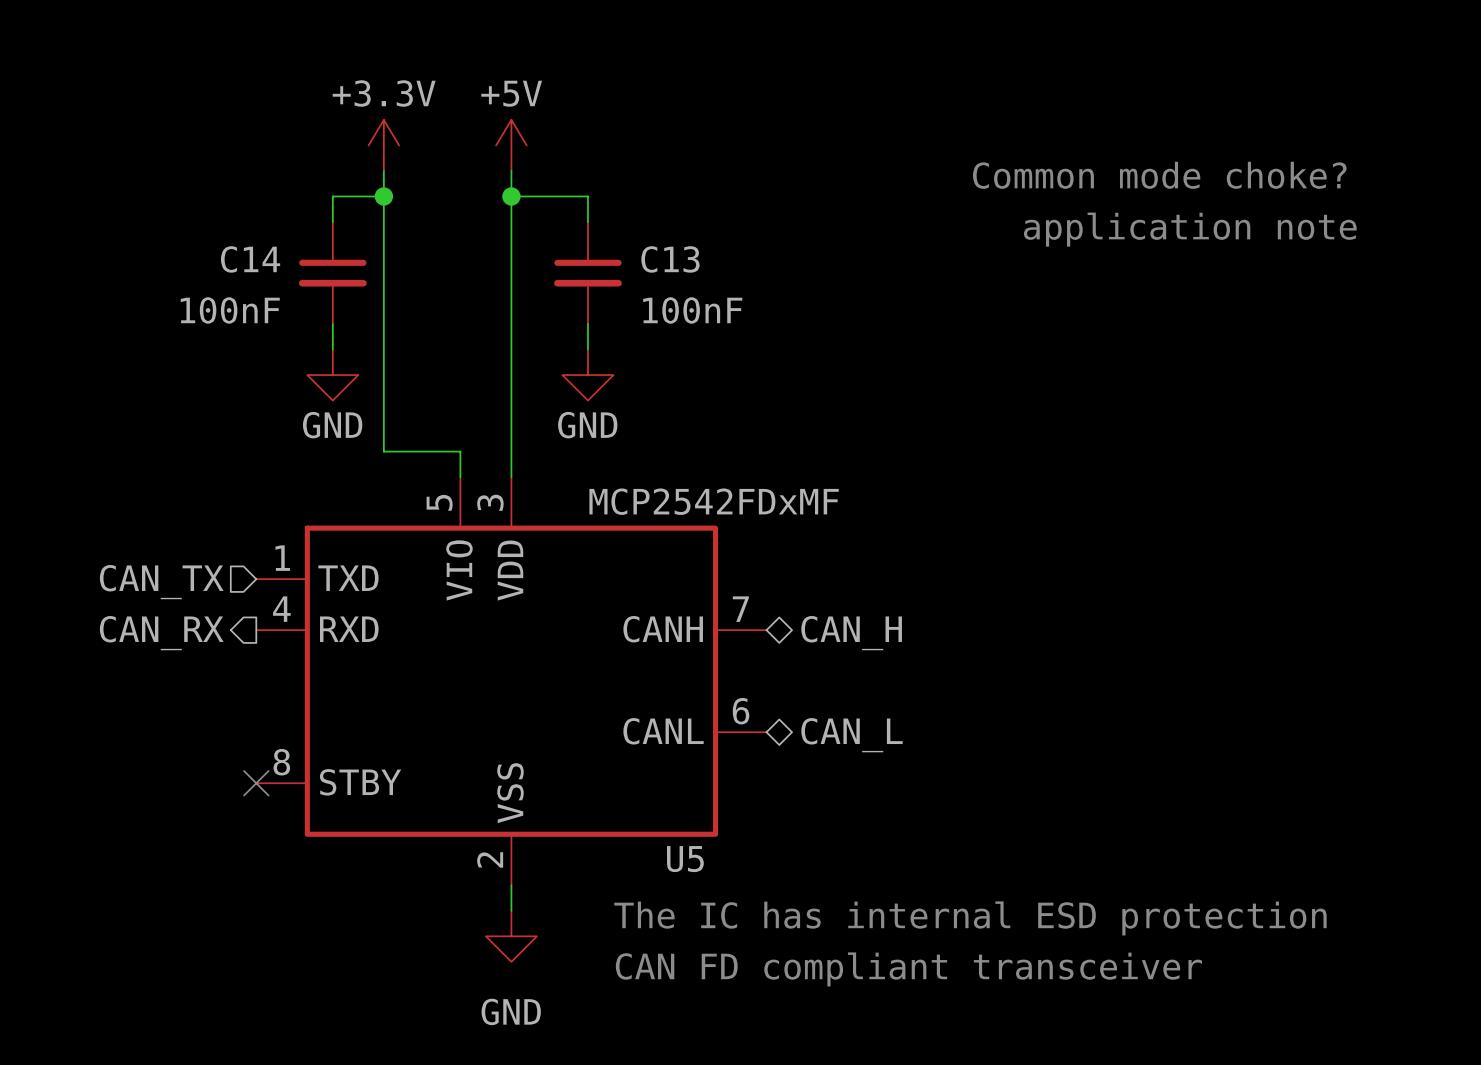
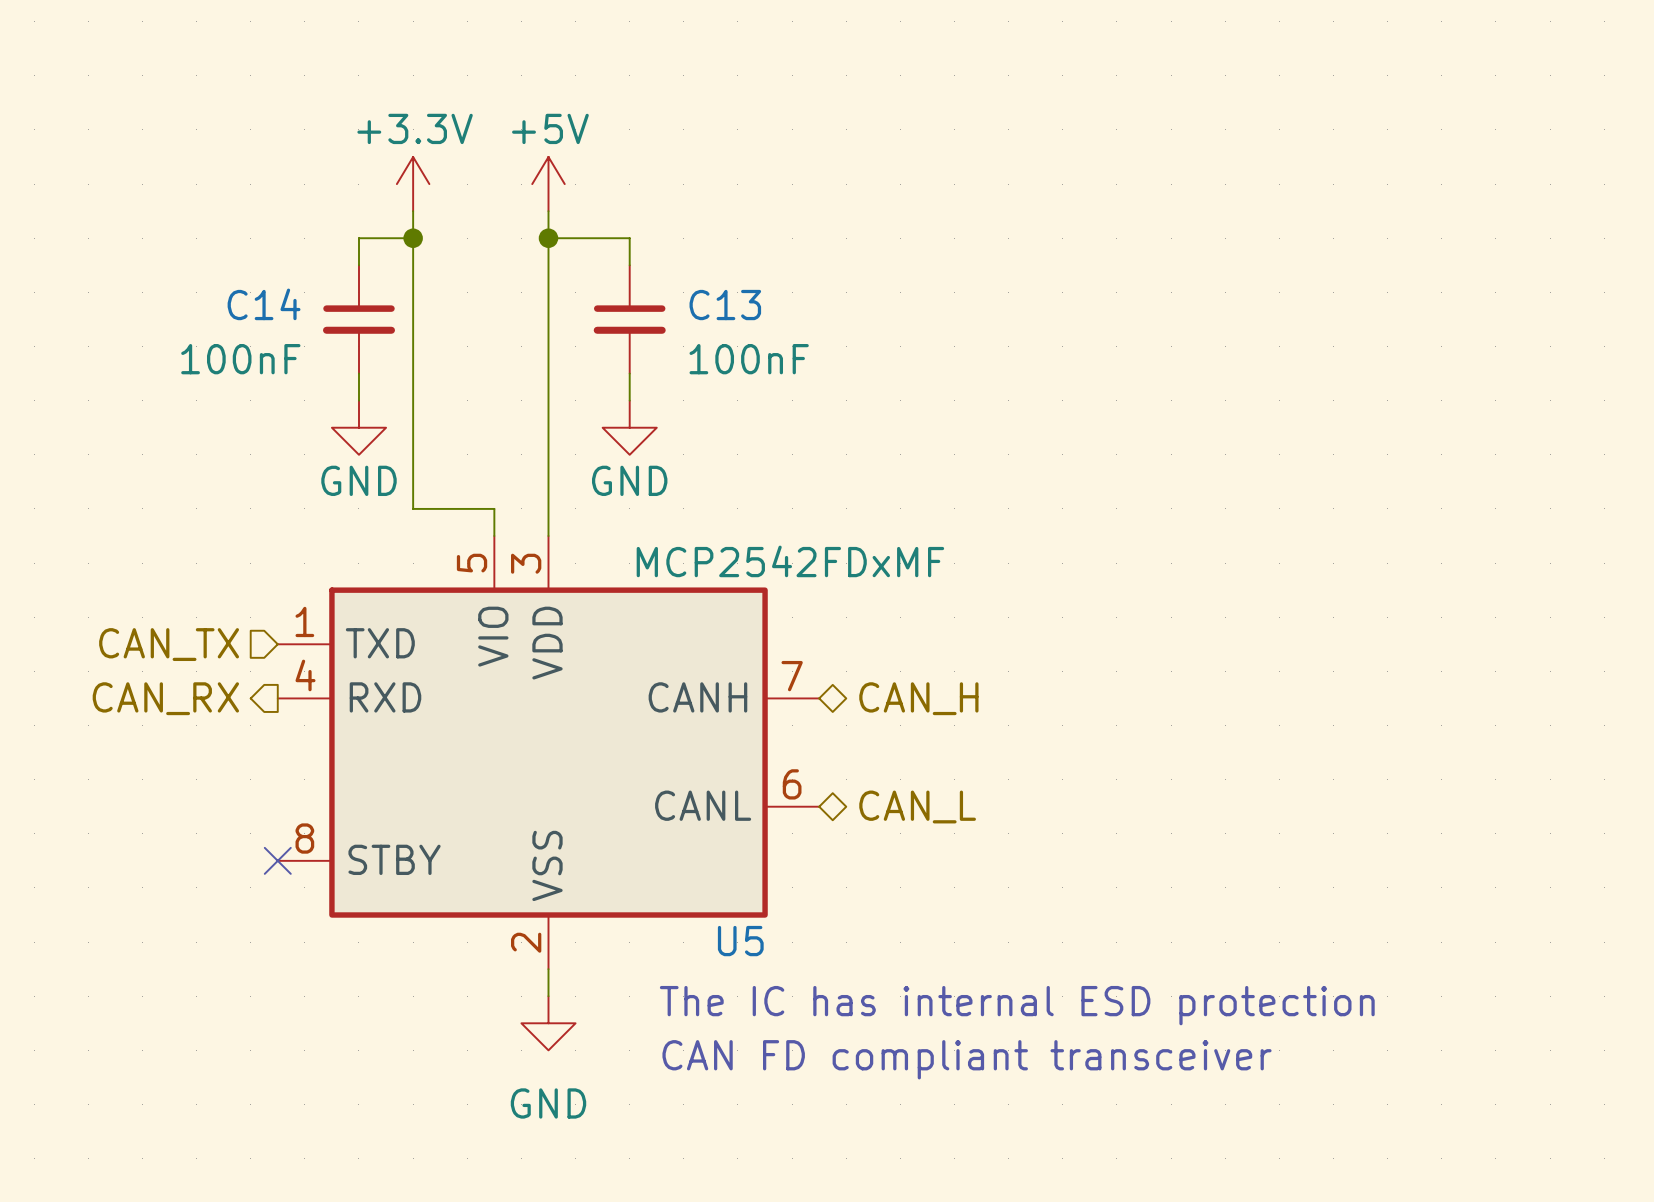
text: Common mode choke? (1159, 175) -> none
text: application note (1190, 229) -> none

